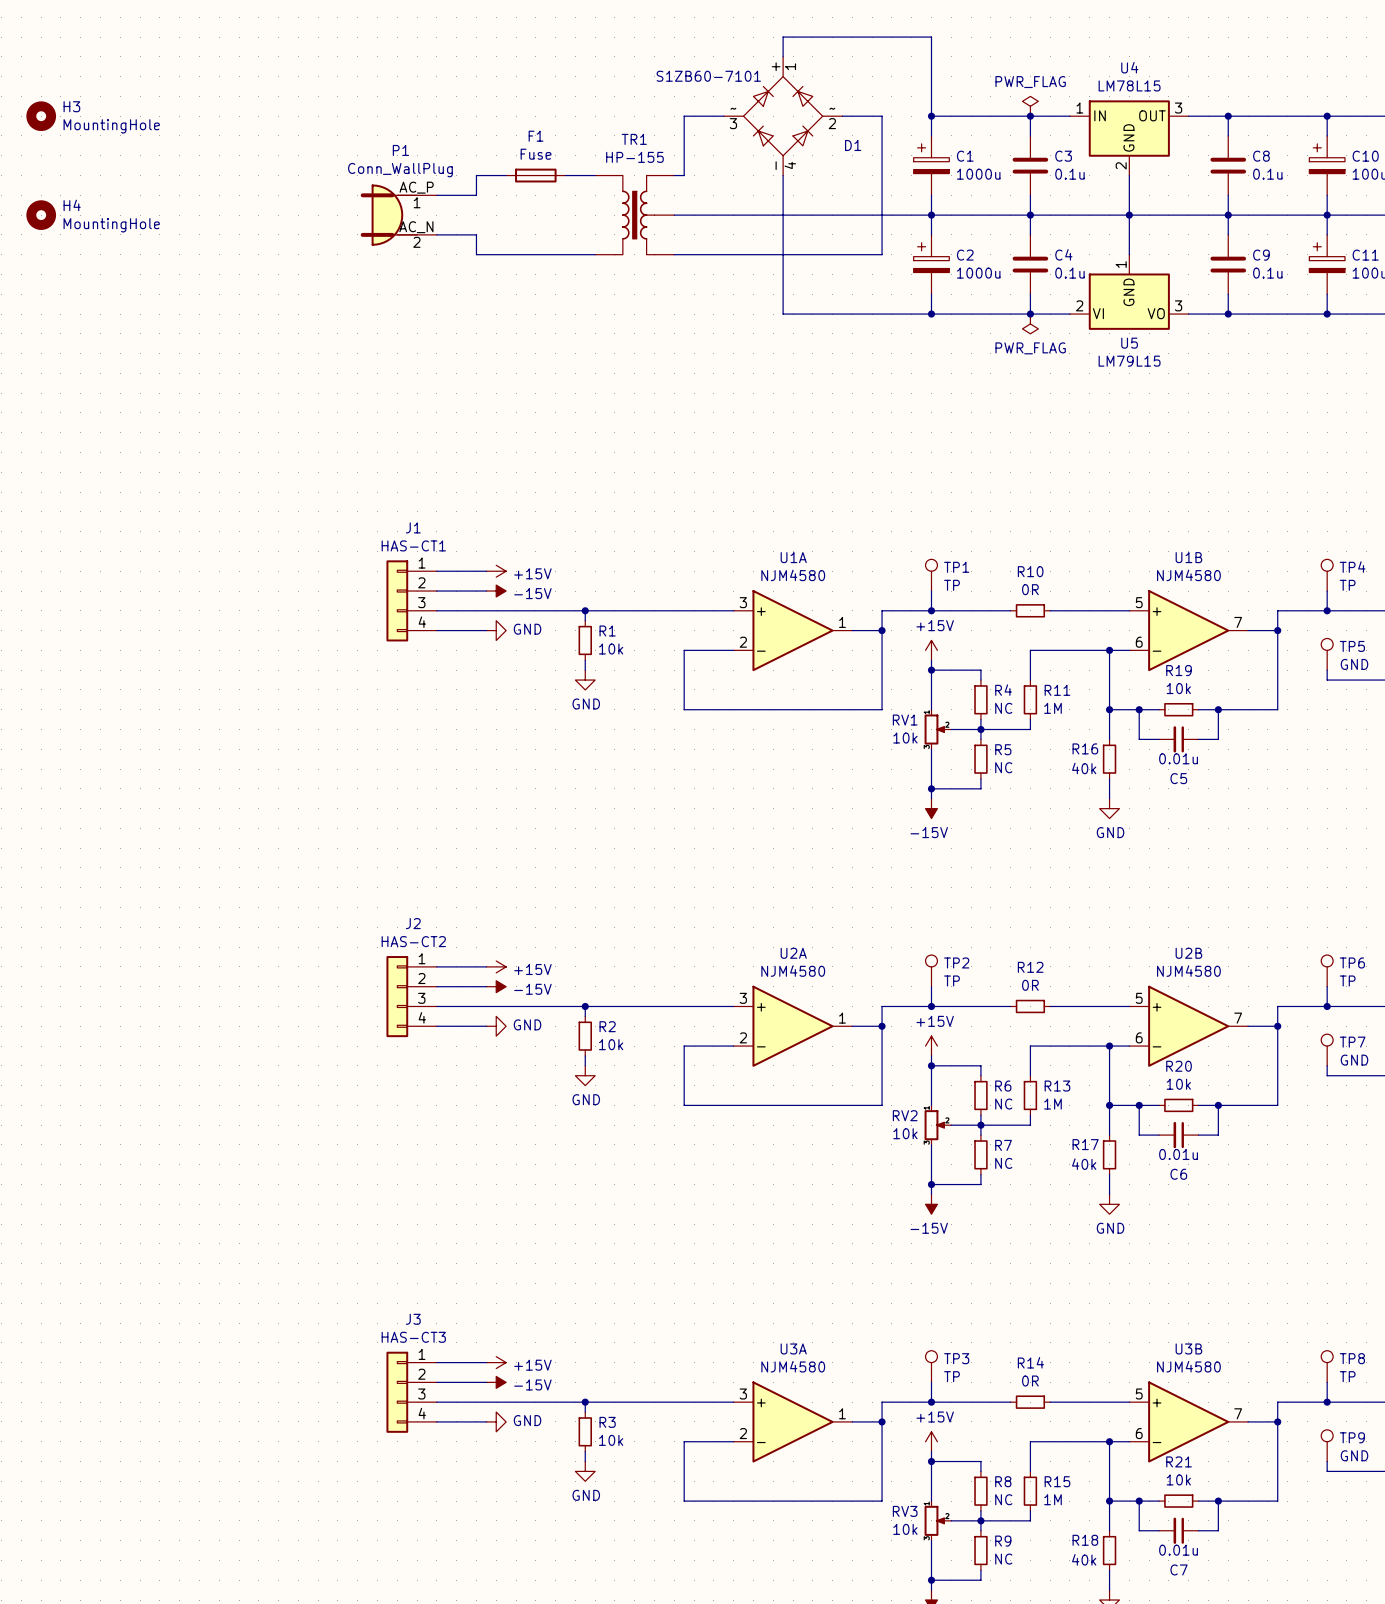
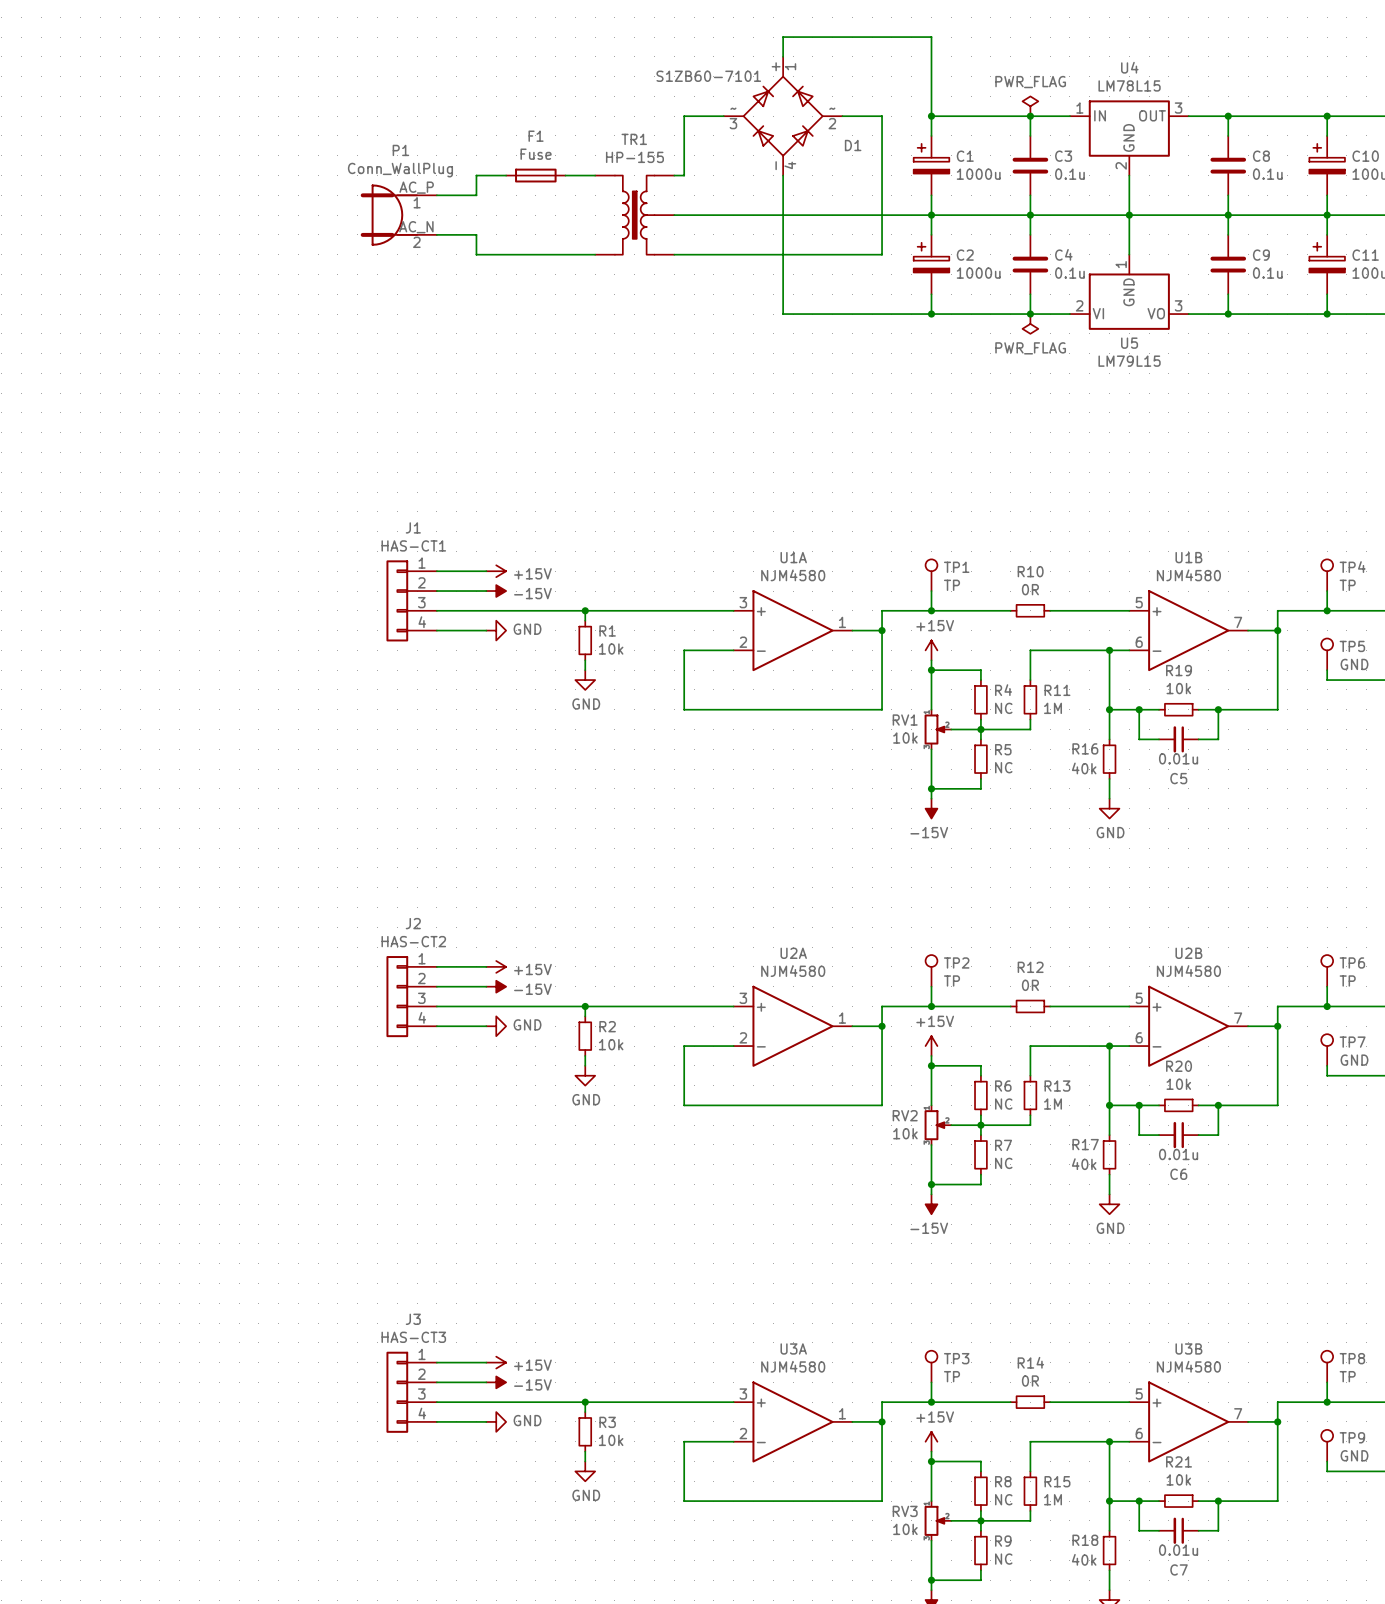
H3: MountingHole (41, 116) -> none
H4: MountingHole (41, 215) -> none

